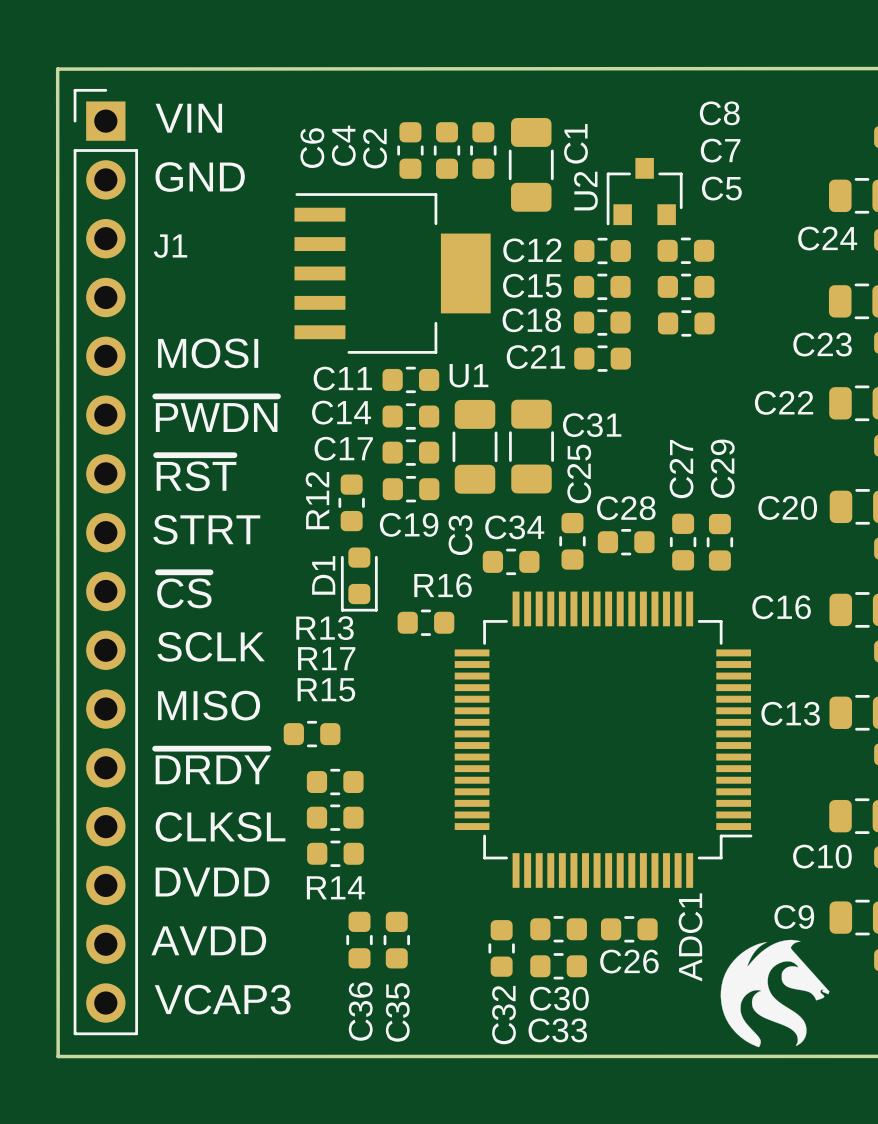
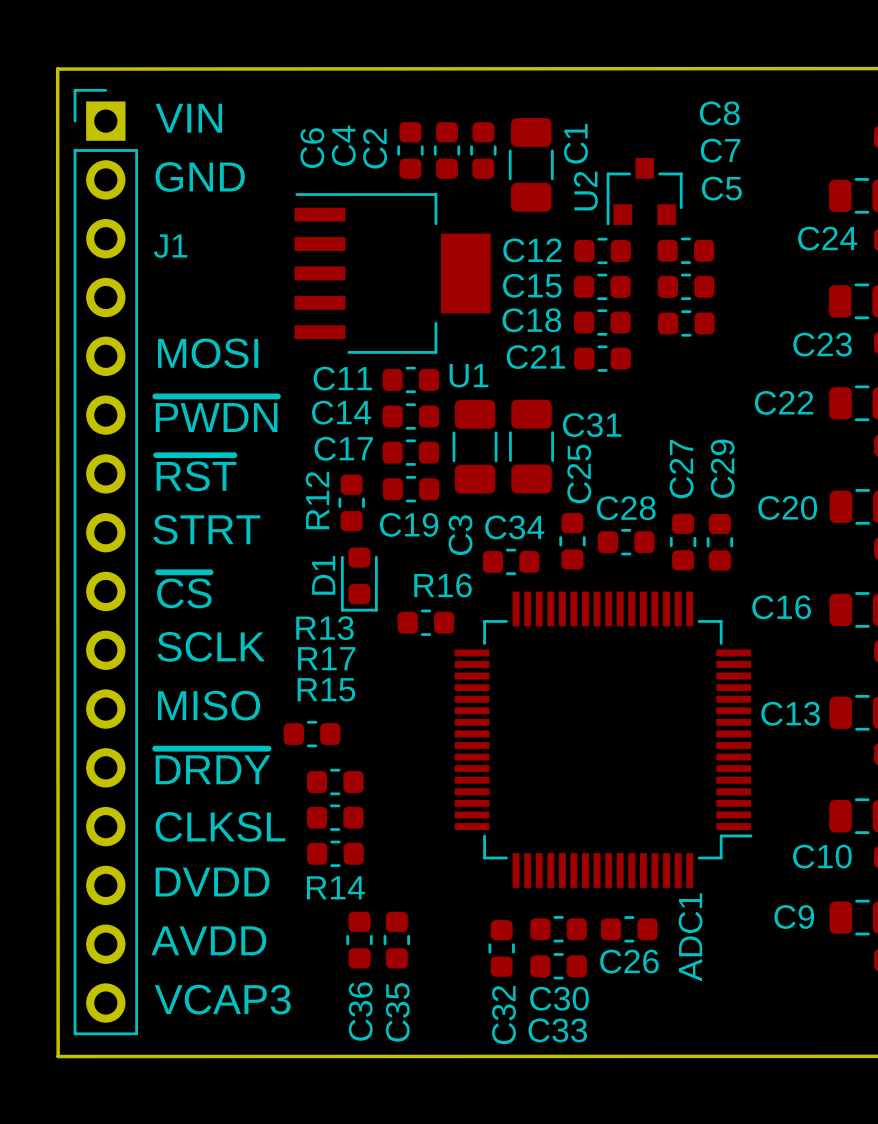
drawing: [720, 939, 830, 1048] -> none

